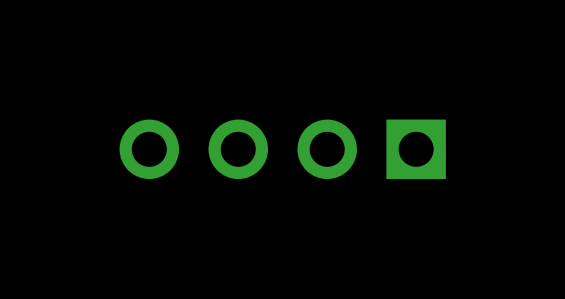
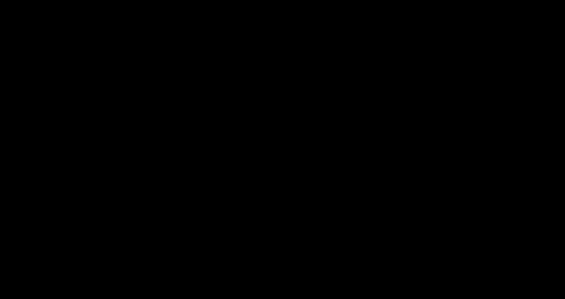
part: (282, 149) -> none

